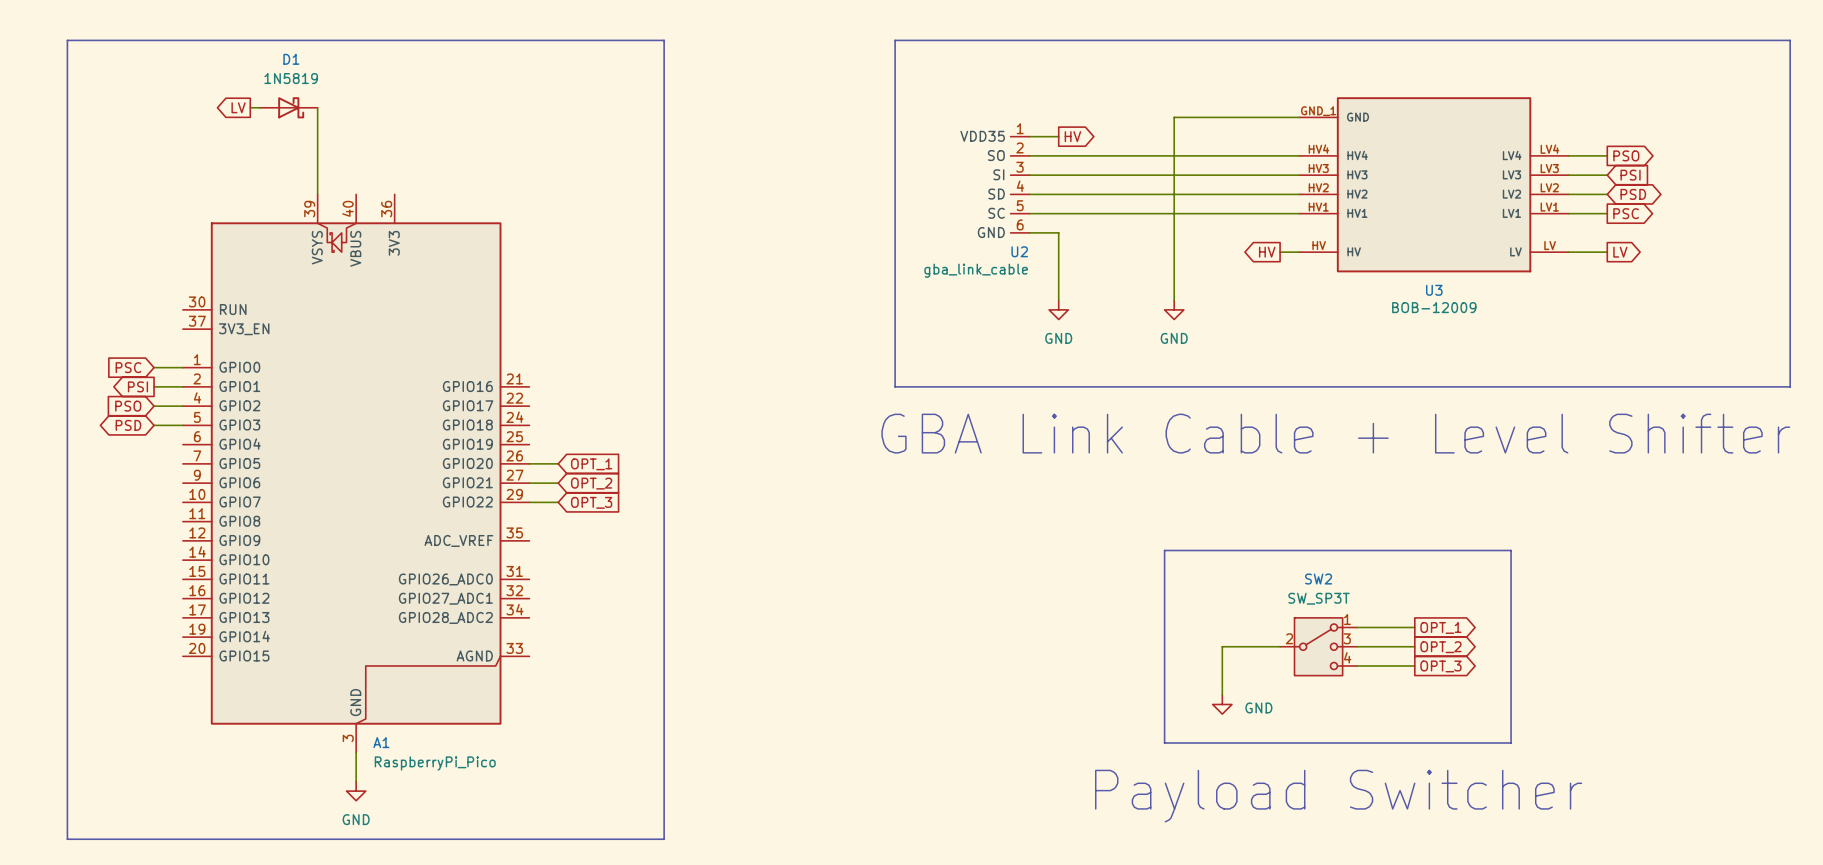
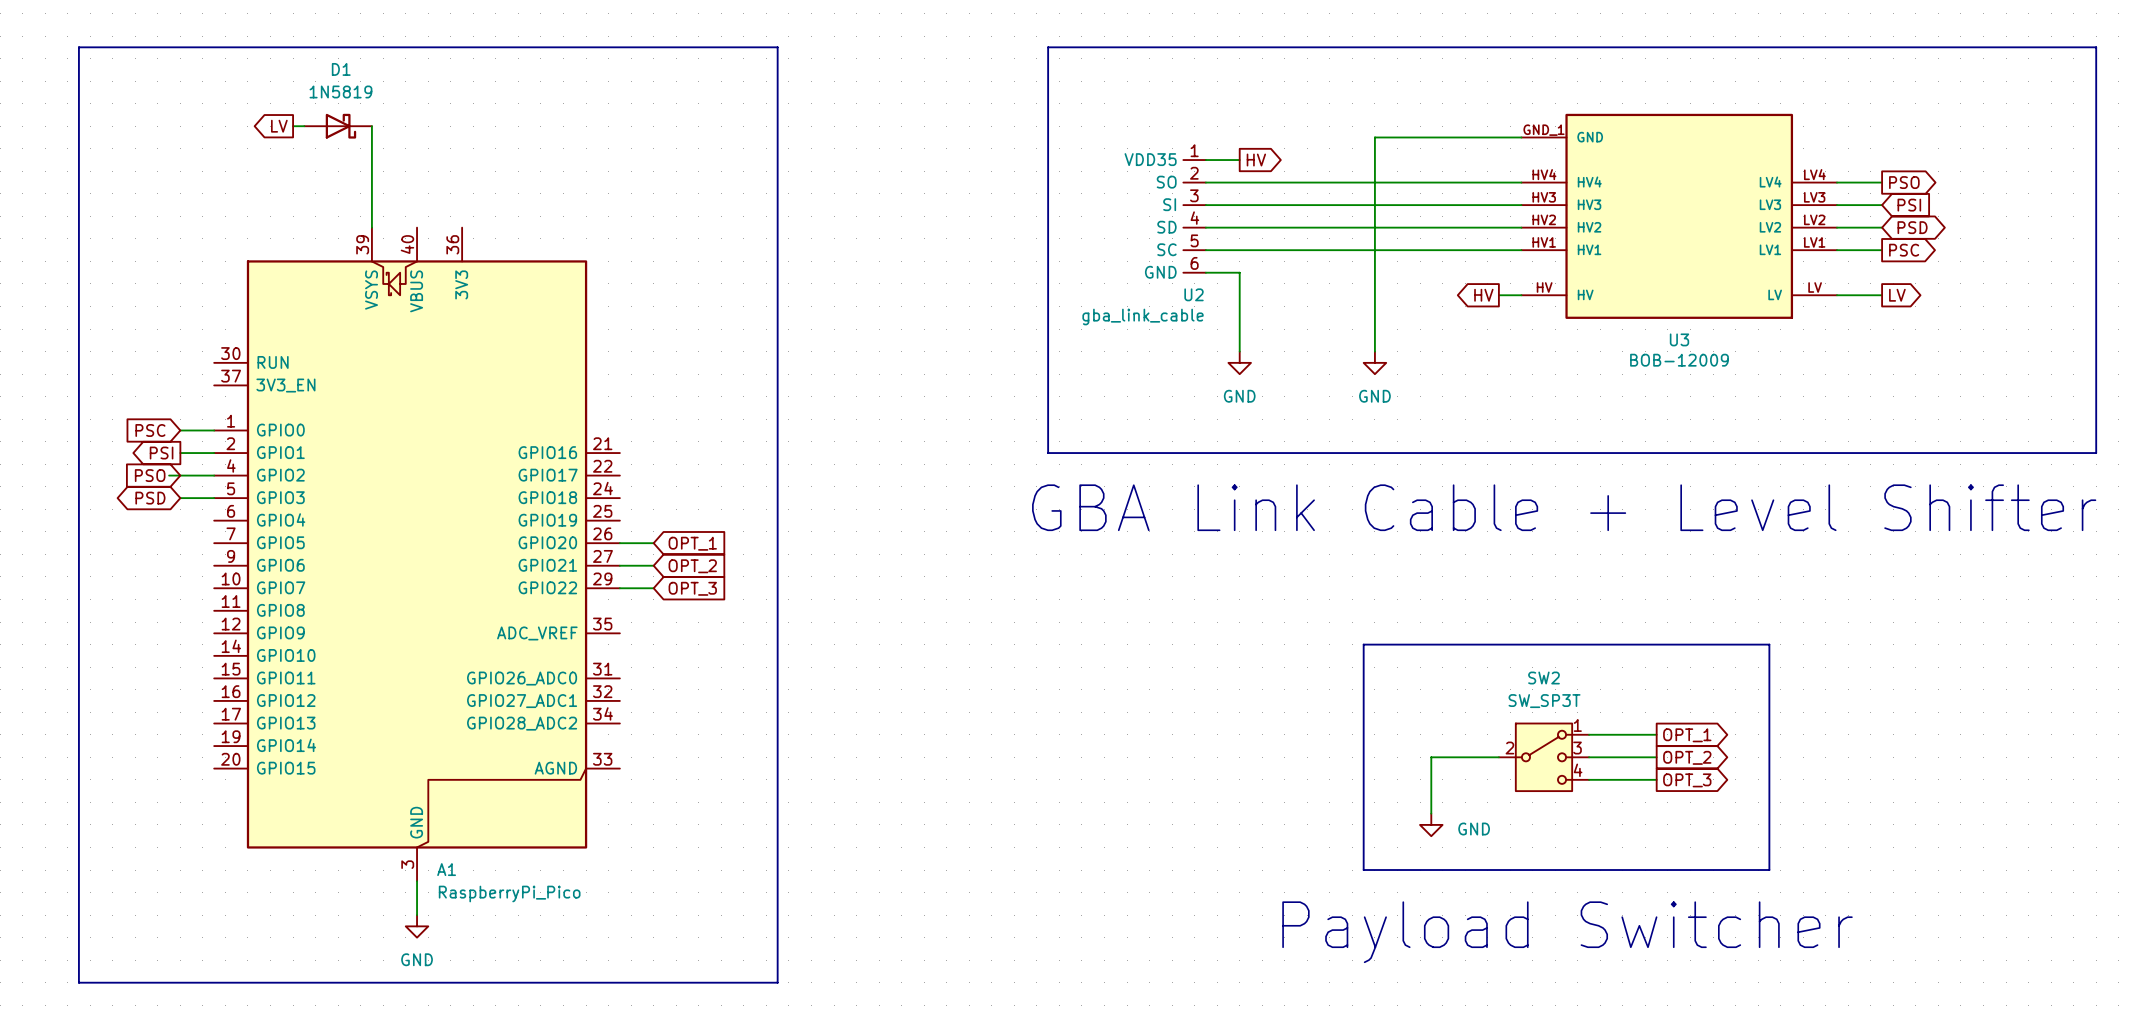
wire: none -> (169, 475) (180, 475)

